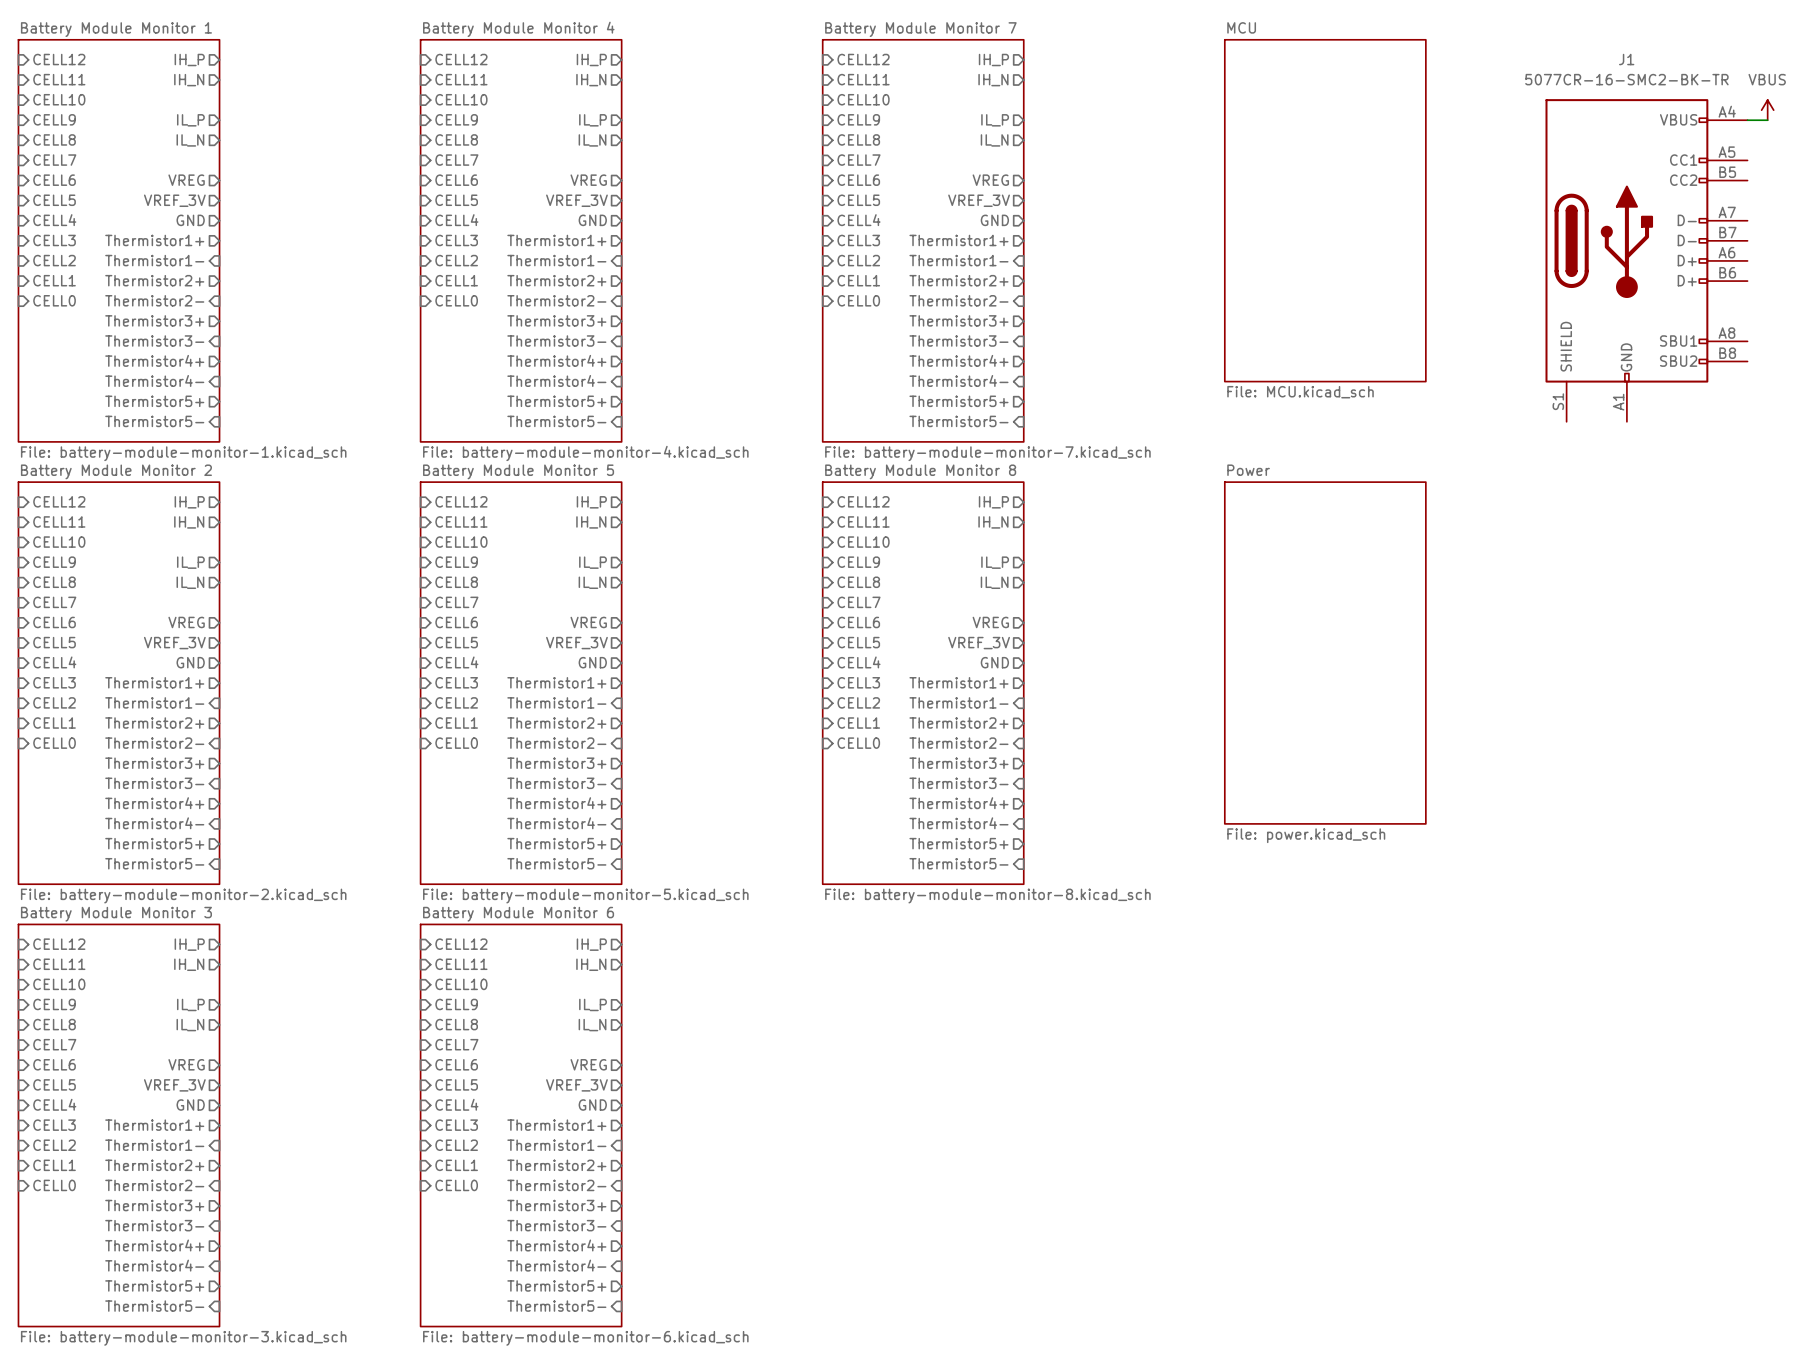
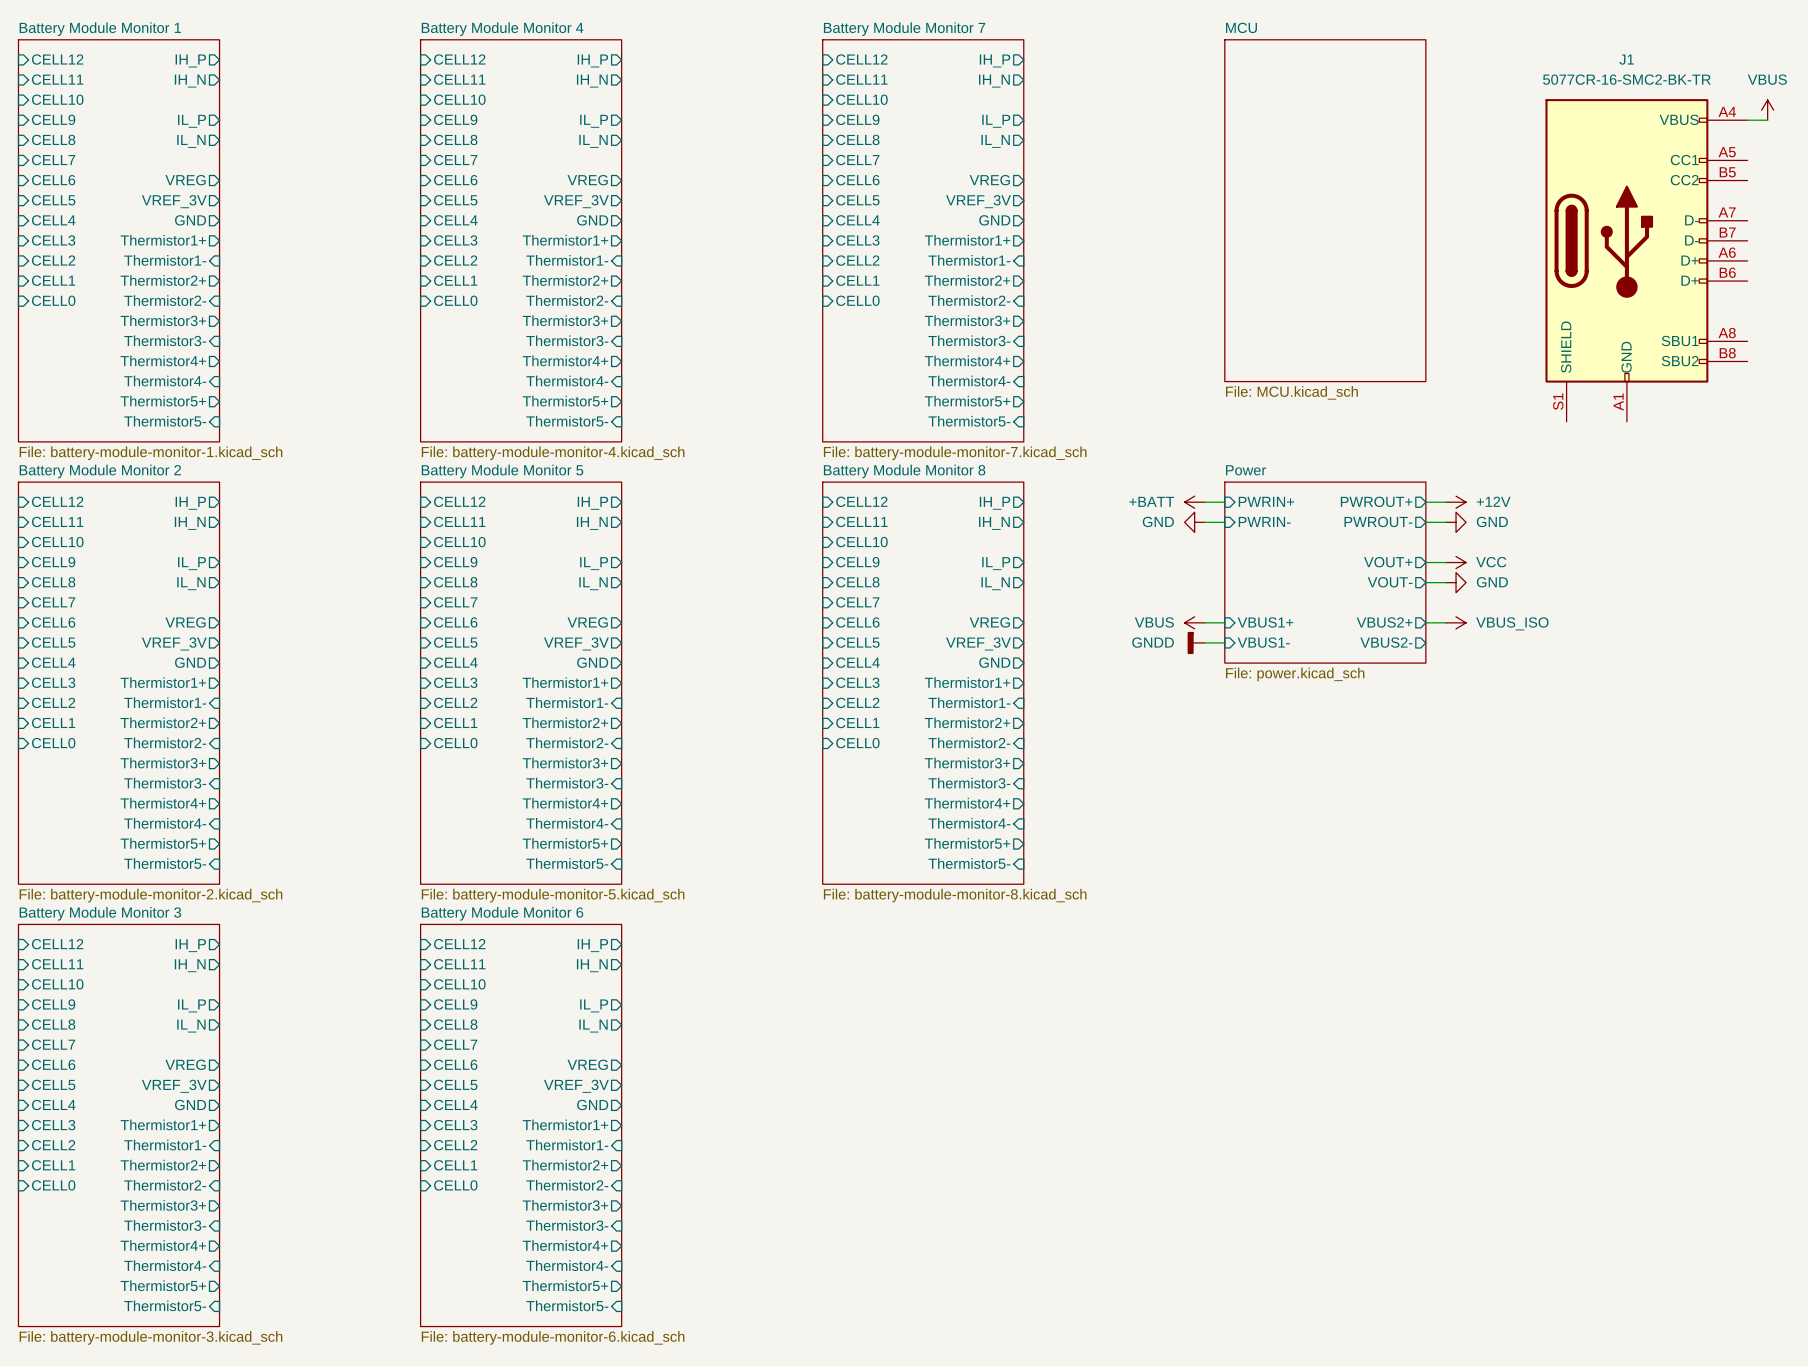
sheet pin: none -> PWRIN+ (1266, 501)
sheet pin: none -> PWROUT+ (1376, 501)
power symbol: none -> +BATT (1194, 502)
wire: none -> (1204, 502) (1224, 502)
wire: none -> (1425, 502) (1445, 502)
power symbol: none -> +12V (1456, 502)
sheet pin: none -> PWRIN- (1264, 521)
sheet pin: none -> PWROUT- (1378, 521)
power symbol: none -> GND (1194, 522)
wire: none -> (1204, 522) (1224, 522)
wire: none -> (1425, 522) (1445, 522)
power symbol: none -> GND (1456, 522)
sheet pin: none -> VOUT+ (1388, 562)
wire: none -> (1425, 562) (1445, 562)
power symbol: none -> VCC (1456, 562)
sheet Power: none -> File: power.kicad_sch (1325, 572)
sheet pin: none -> VOUT- (1390, 582)
wire: none -> (1425, 582) (1445, 582)
power symbol: none -> GND (1456, 582)
power symbol: none -> VBUS (1194, 622)
wire: none -> (1204, 622) (1224, 622)
sheet pin: none -> VBUS1+ (1265, 622)
sheet pin: none -> VBUS2+ (1384, 622)
wire: none -> (1425, 622) (1445, 622)
power symbol: none -> VBUS_ISO (1456, 622)
power symbol: none -> GNDD (1196, 642)
wire: none -> (1204, 642) (1224, 642)
sheet pin: none -> VBUS1- (1263, 642)
sheet pin: none -> VBUS2- (1386, 642)
sheet Power: File: power.kicad_sch (1325, 653) -> none

